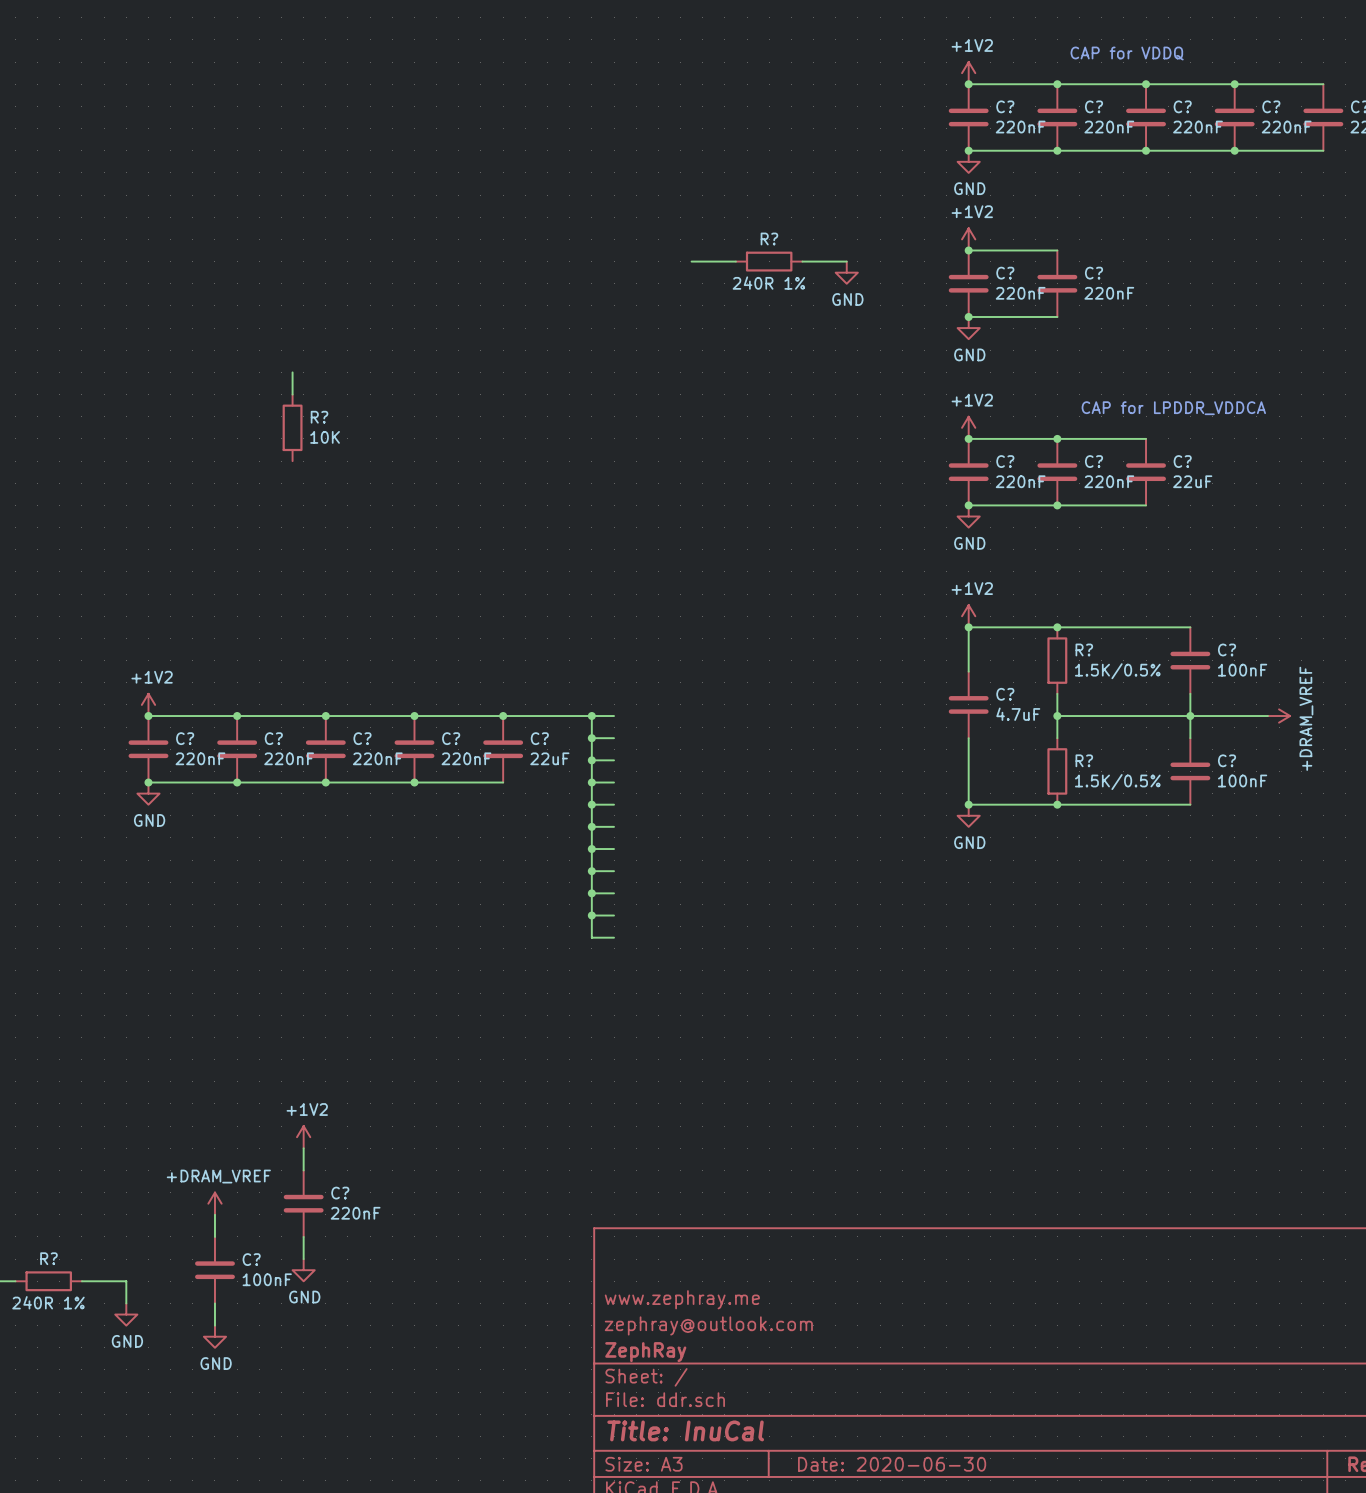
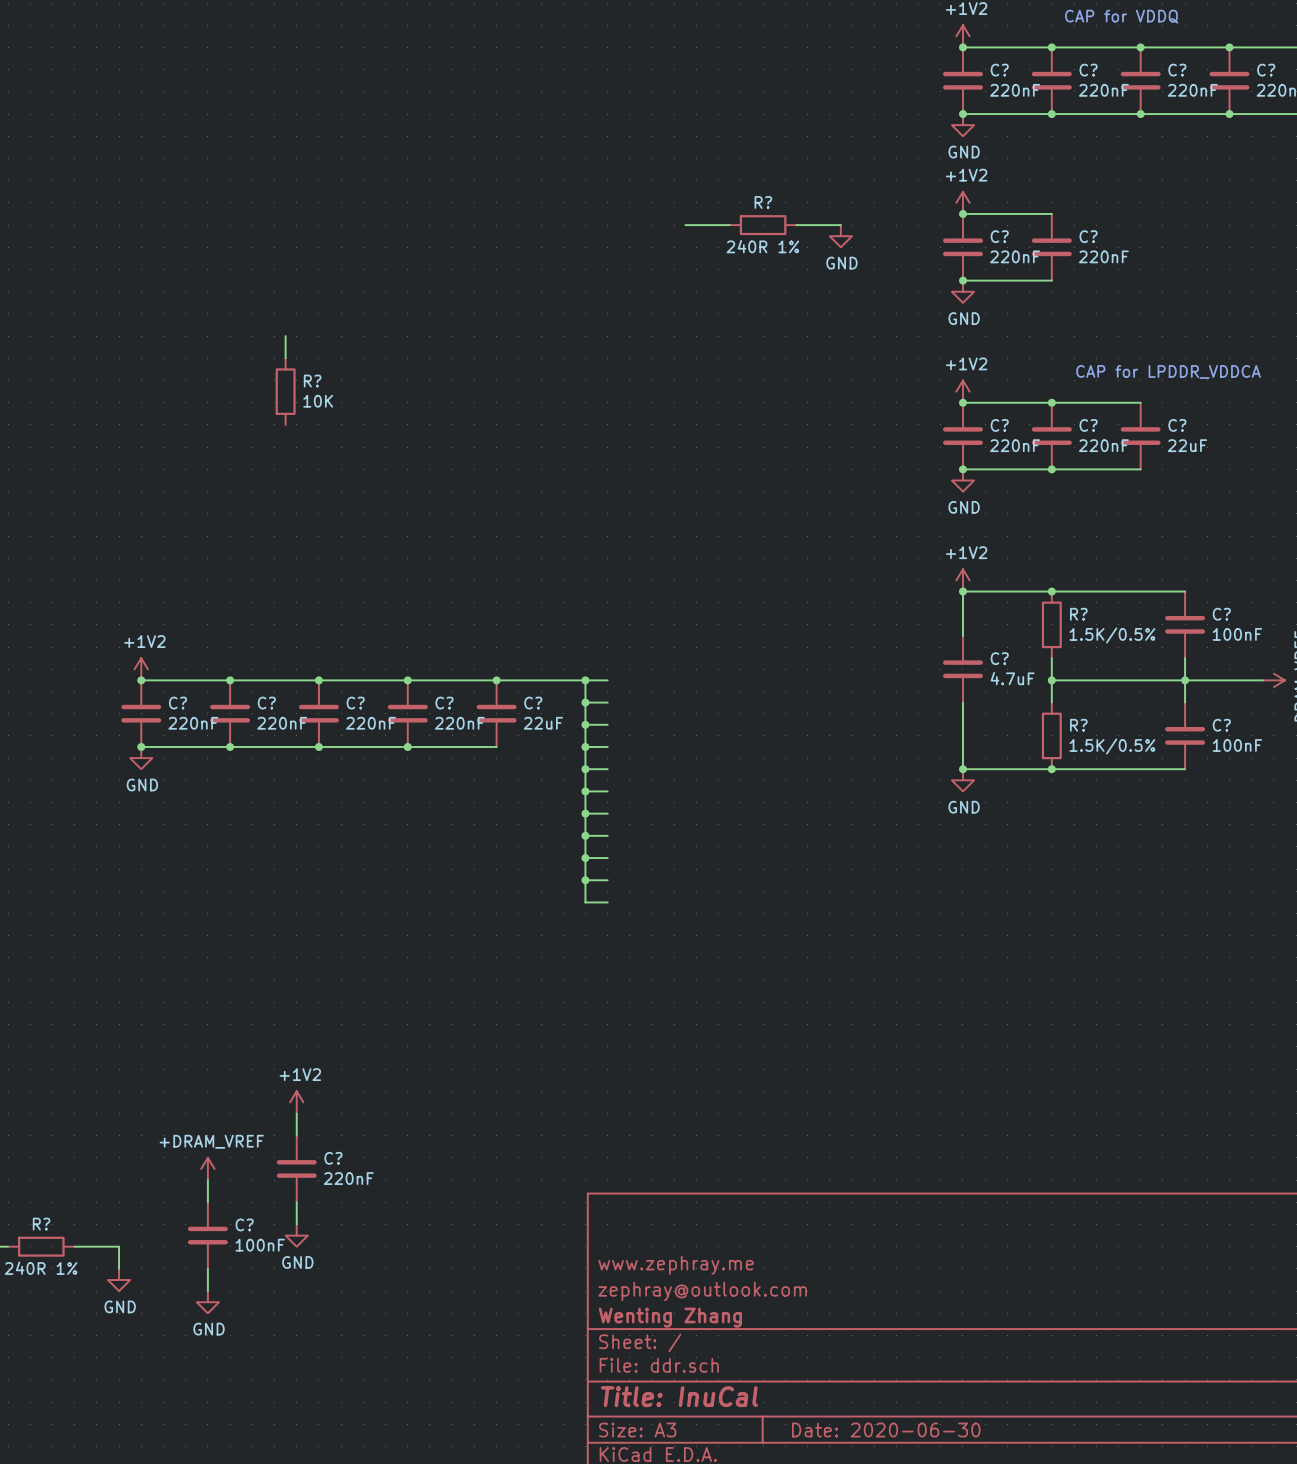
title block: ZephRay (645, 1352) -> Wenting Zhang (670, 1317)

